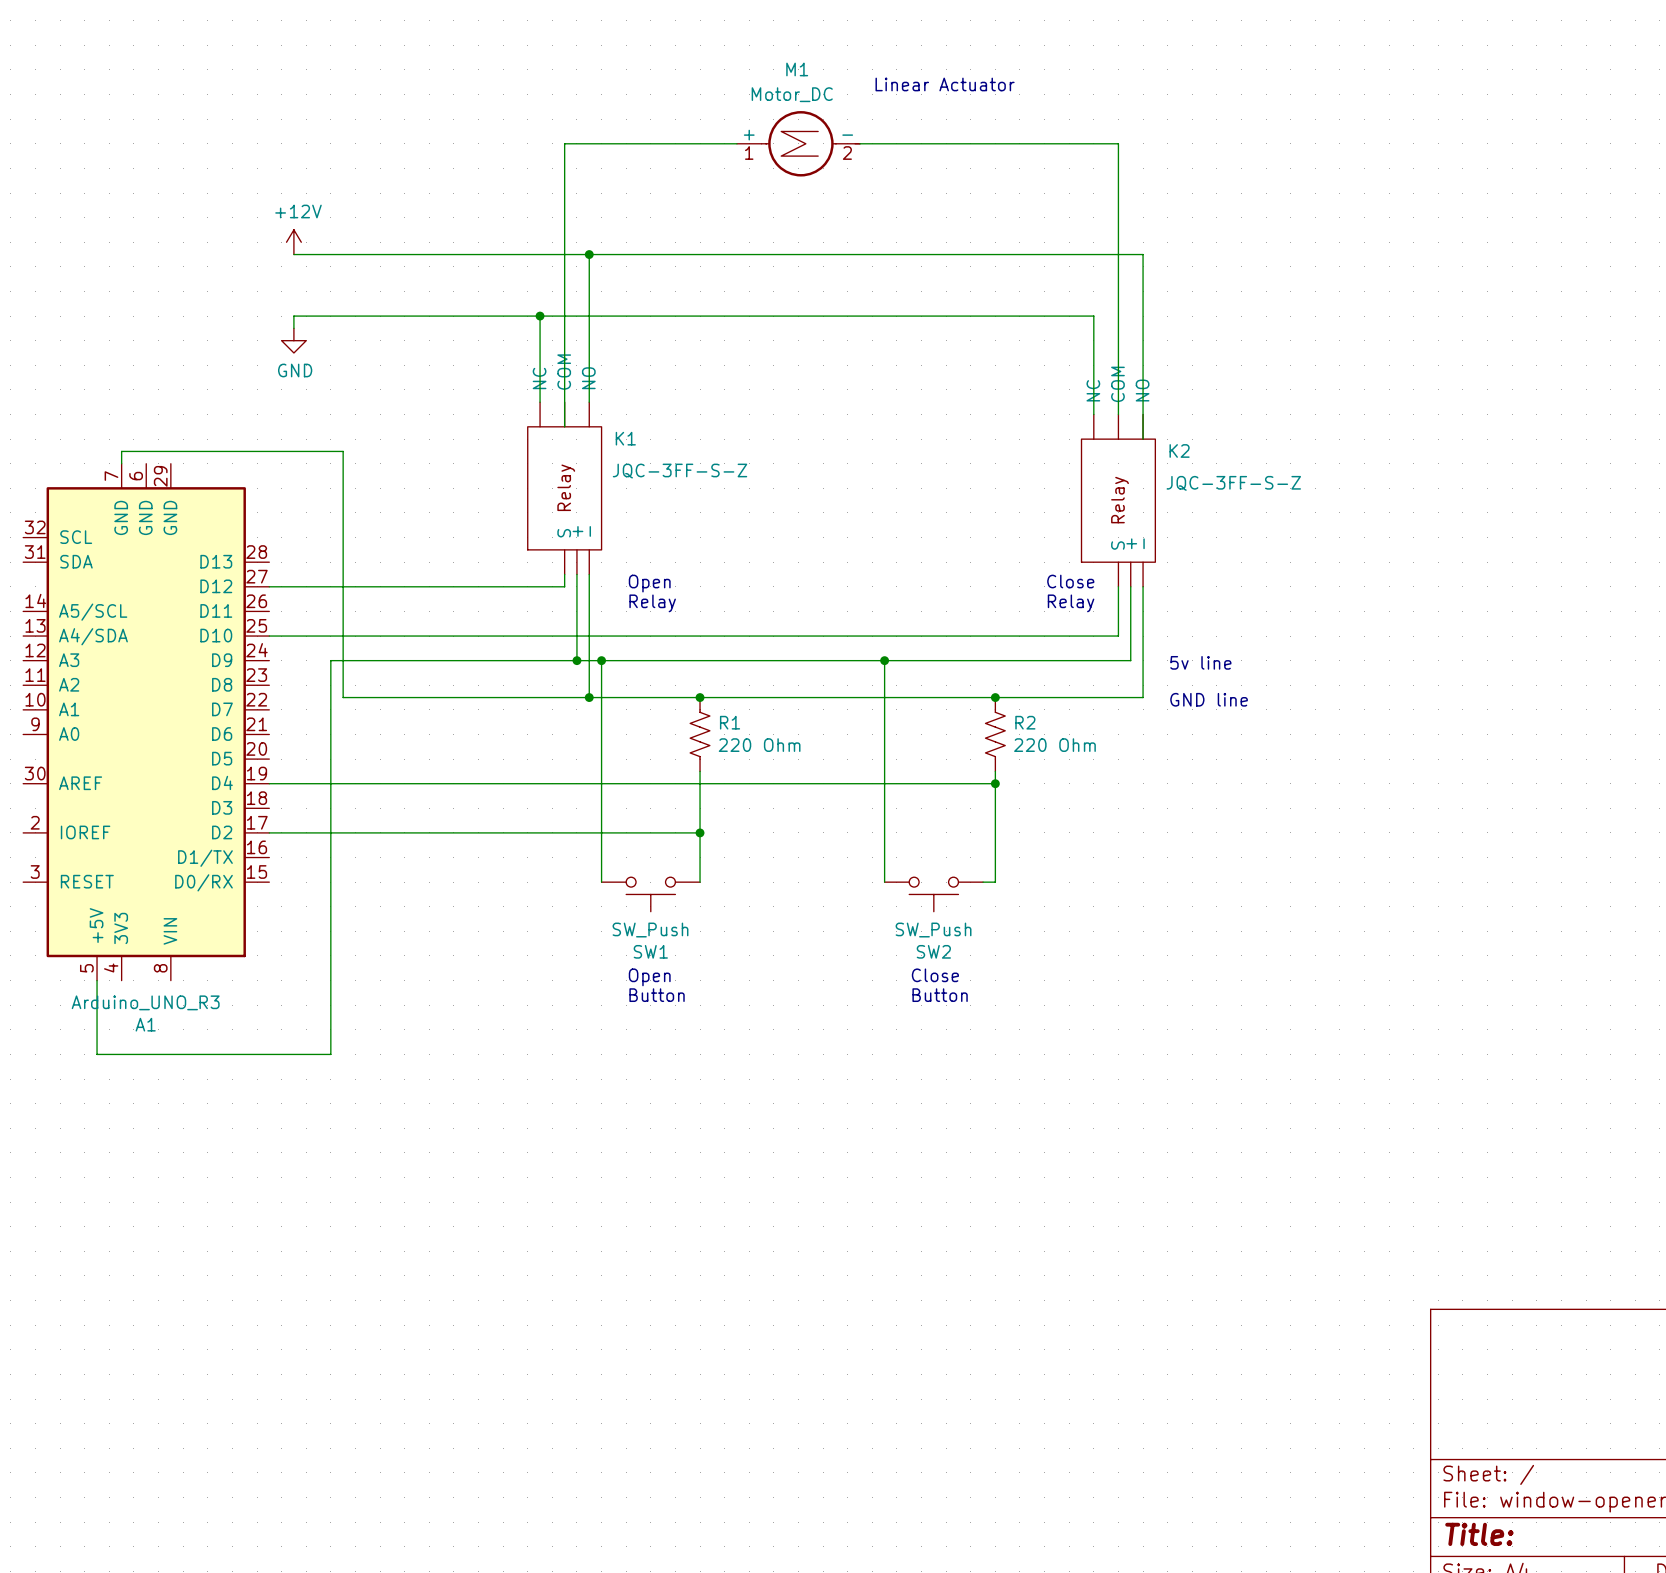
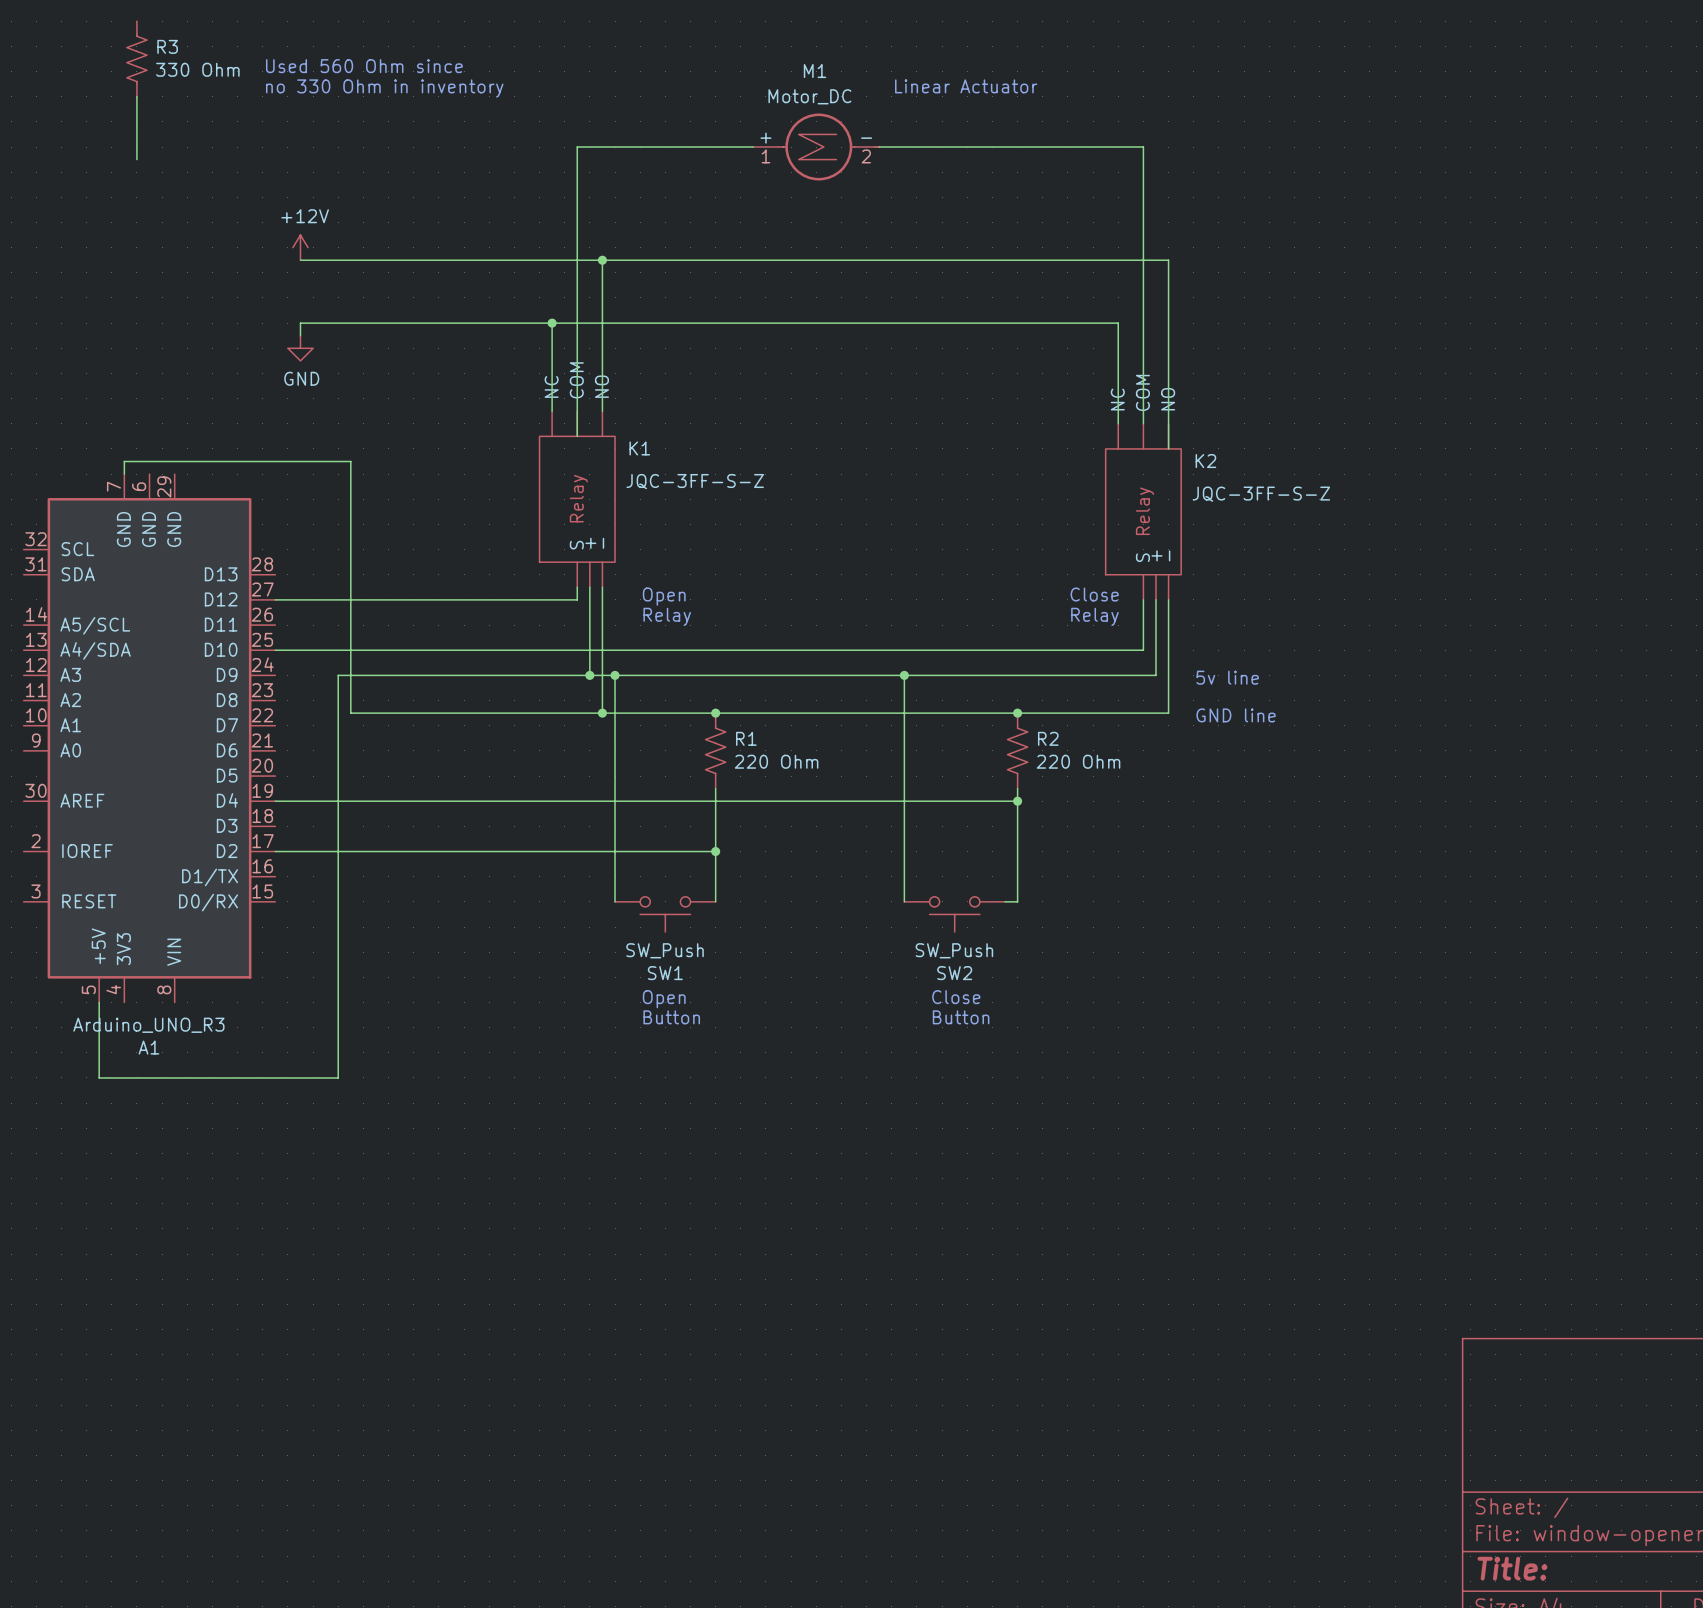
R3: none -> 330 Ohm (136, 58)
text: none -> Used 560 Ohm since (364, 66)
text: none -> no 330 Ohm in inventory (384, 88)
wire: none -> (136, 96) (136, 159)

